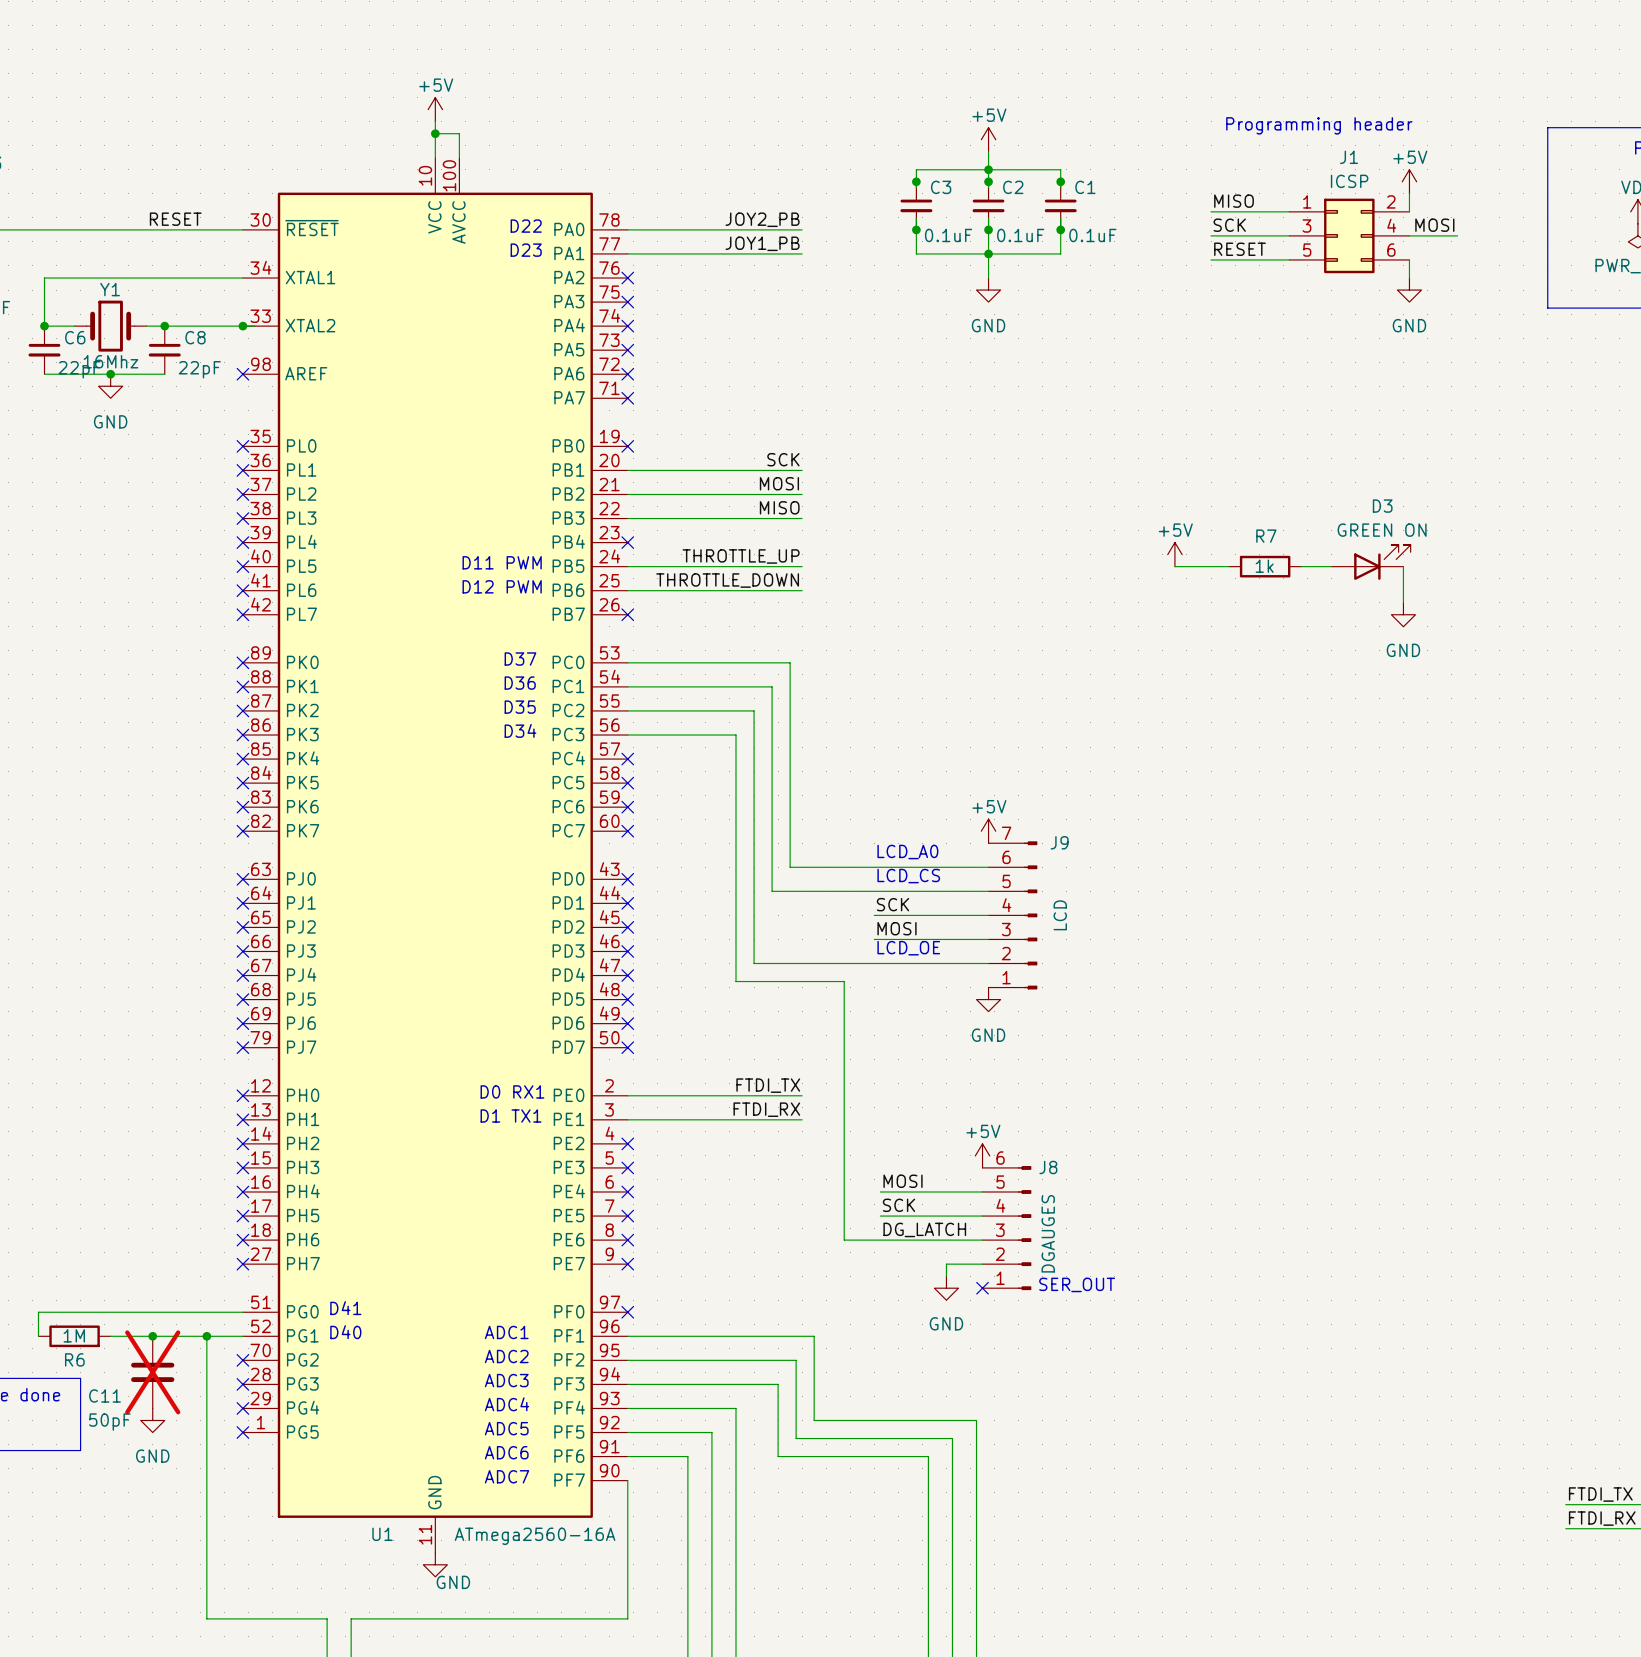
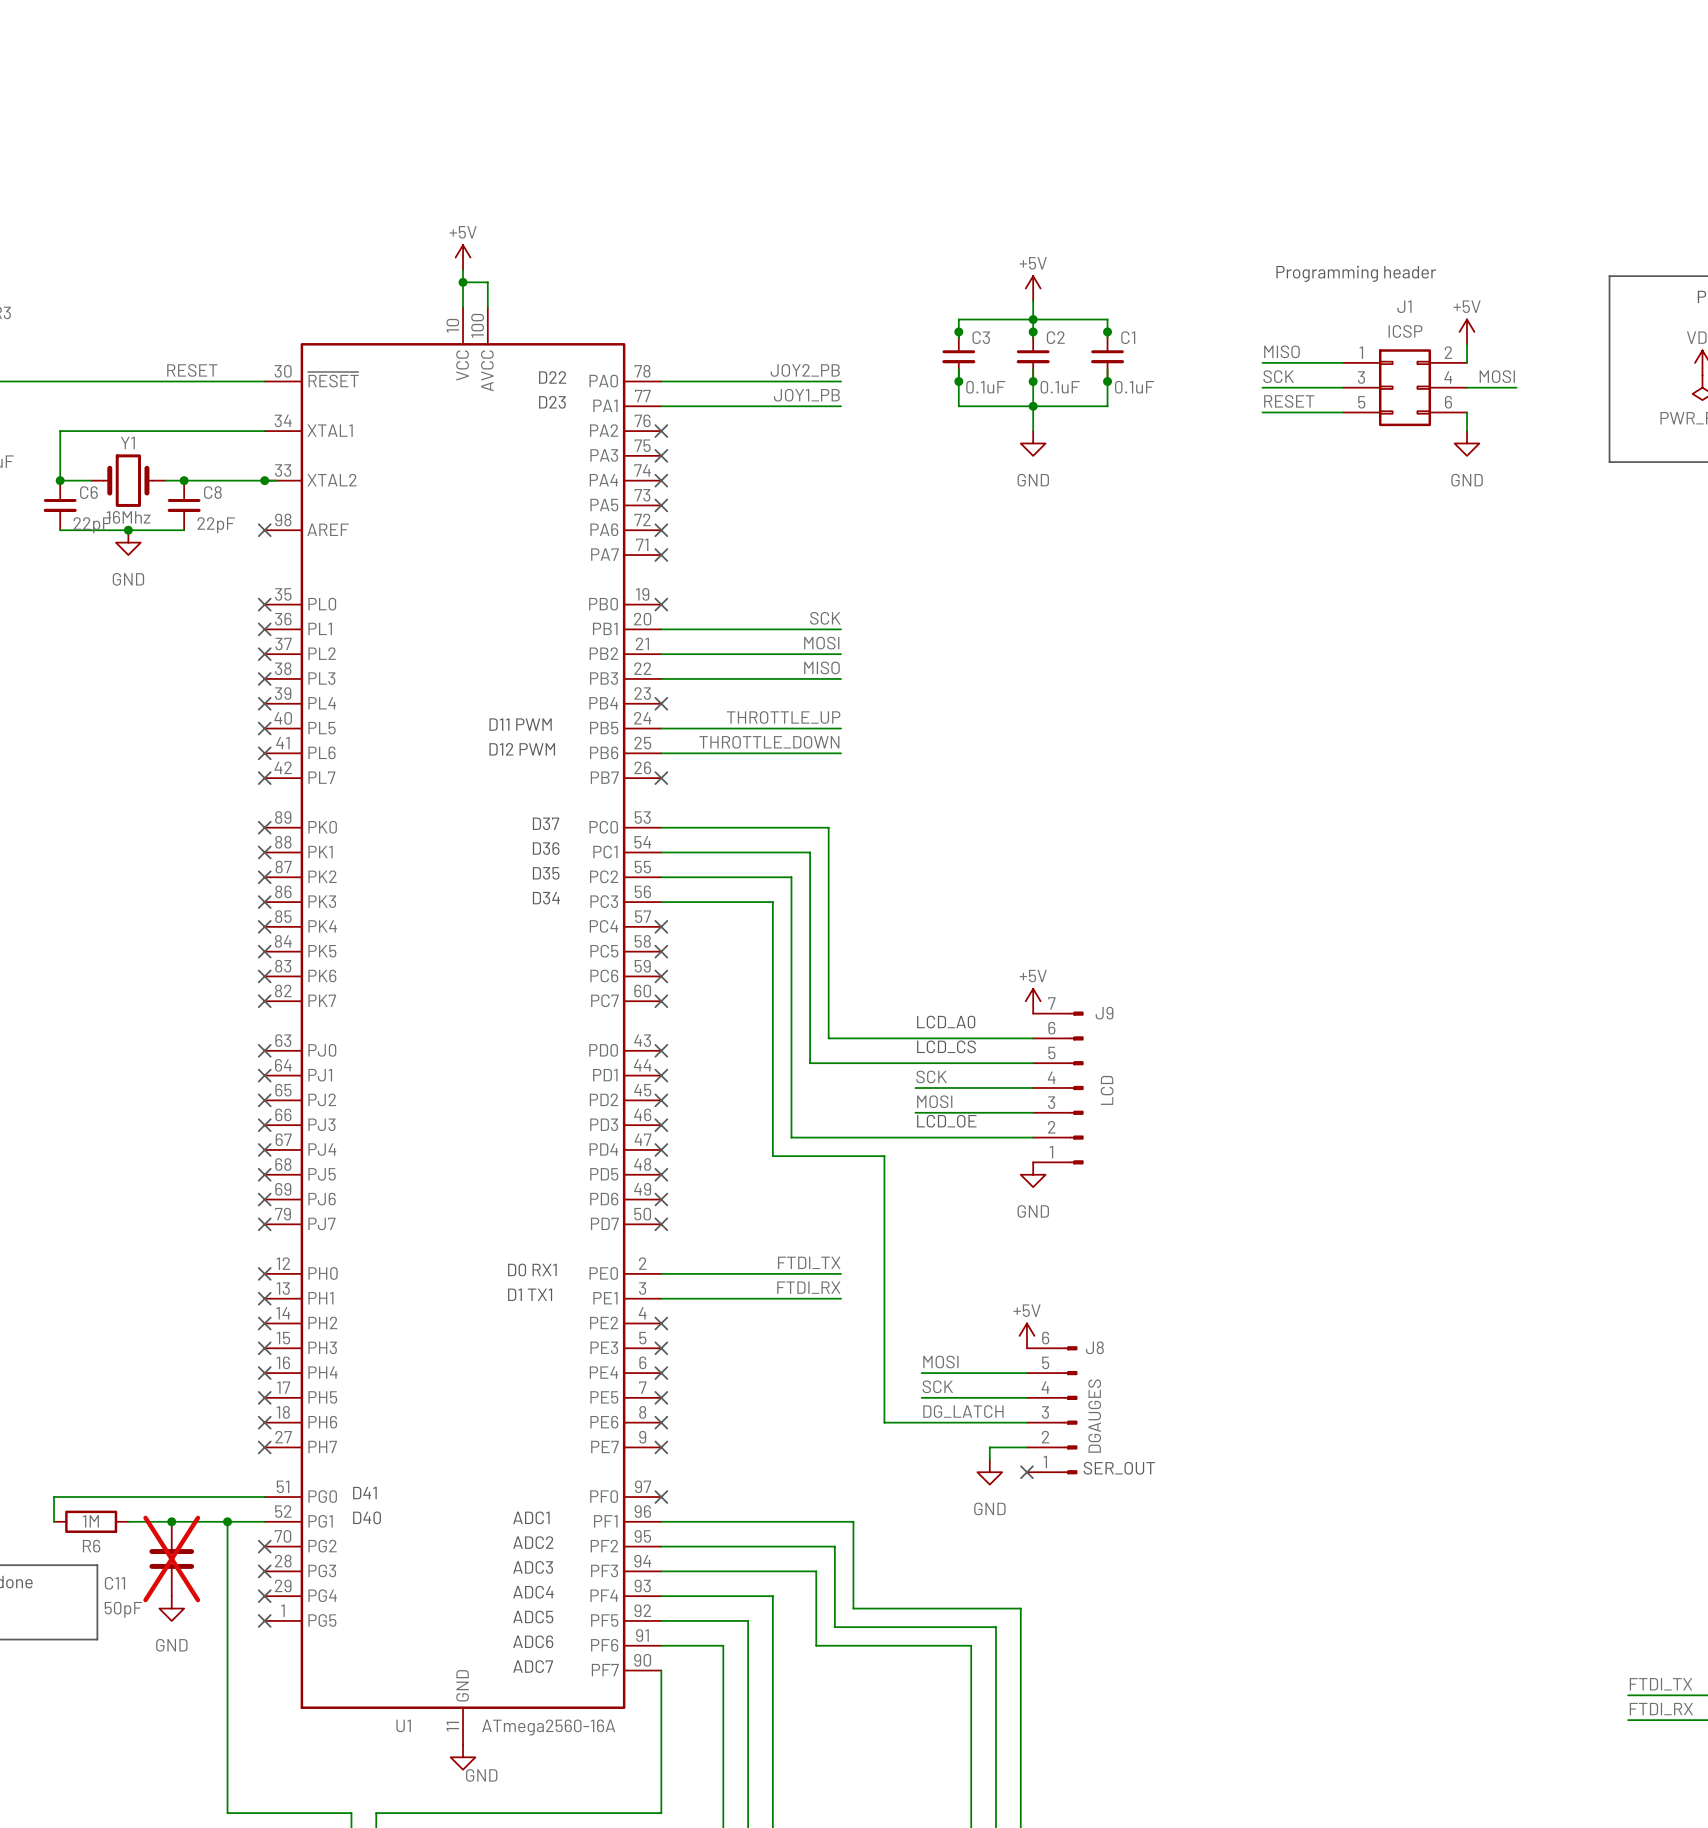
power symbol: +5V (1174, 554) -> none
D3: GREEN ON (1370, 562) -> none
wire: (1174, 566) (1229, 566) -> none
R7: 1k (1265, 566) -> none
wire: (1301, 566) (1331, 566) -> none
wire: (1403, 566) (1403, 602) -> none
power symbol: GND (1403, 614) -> none

